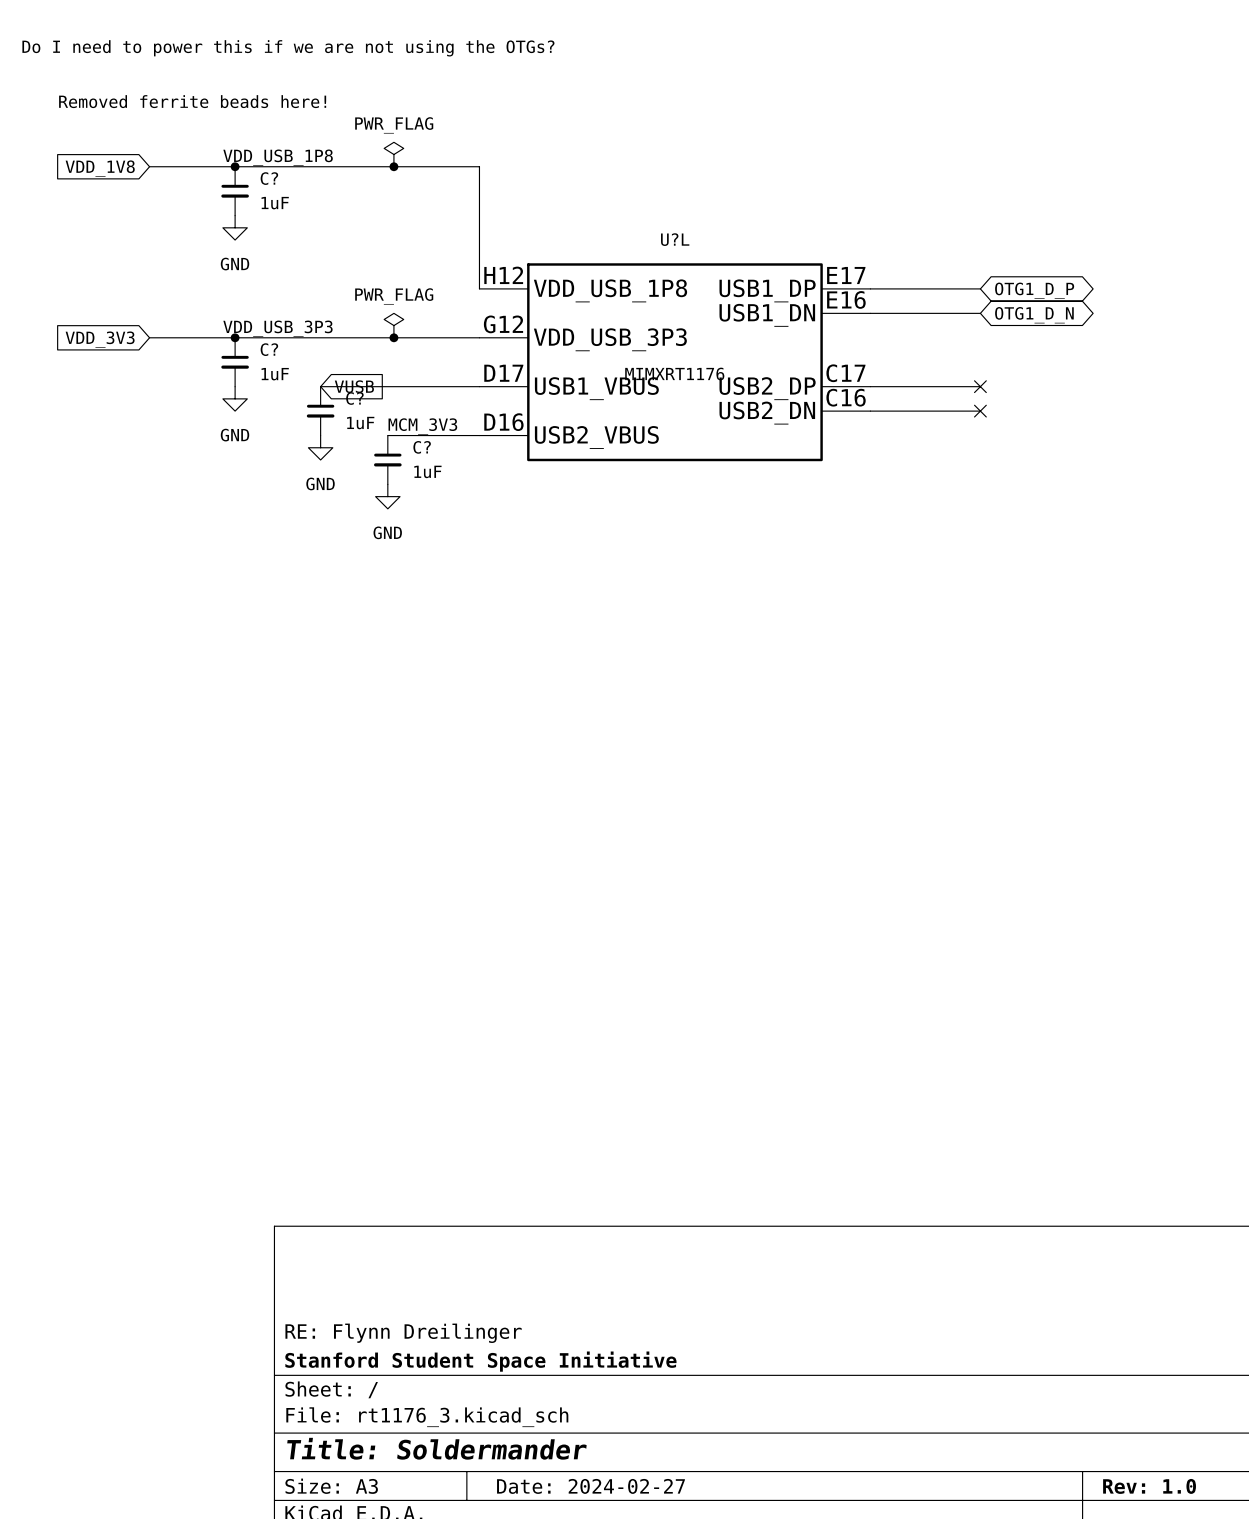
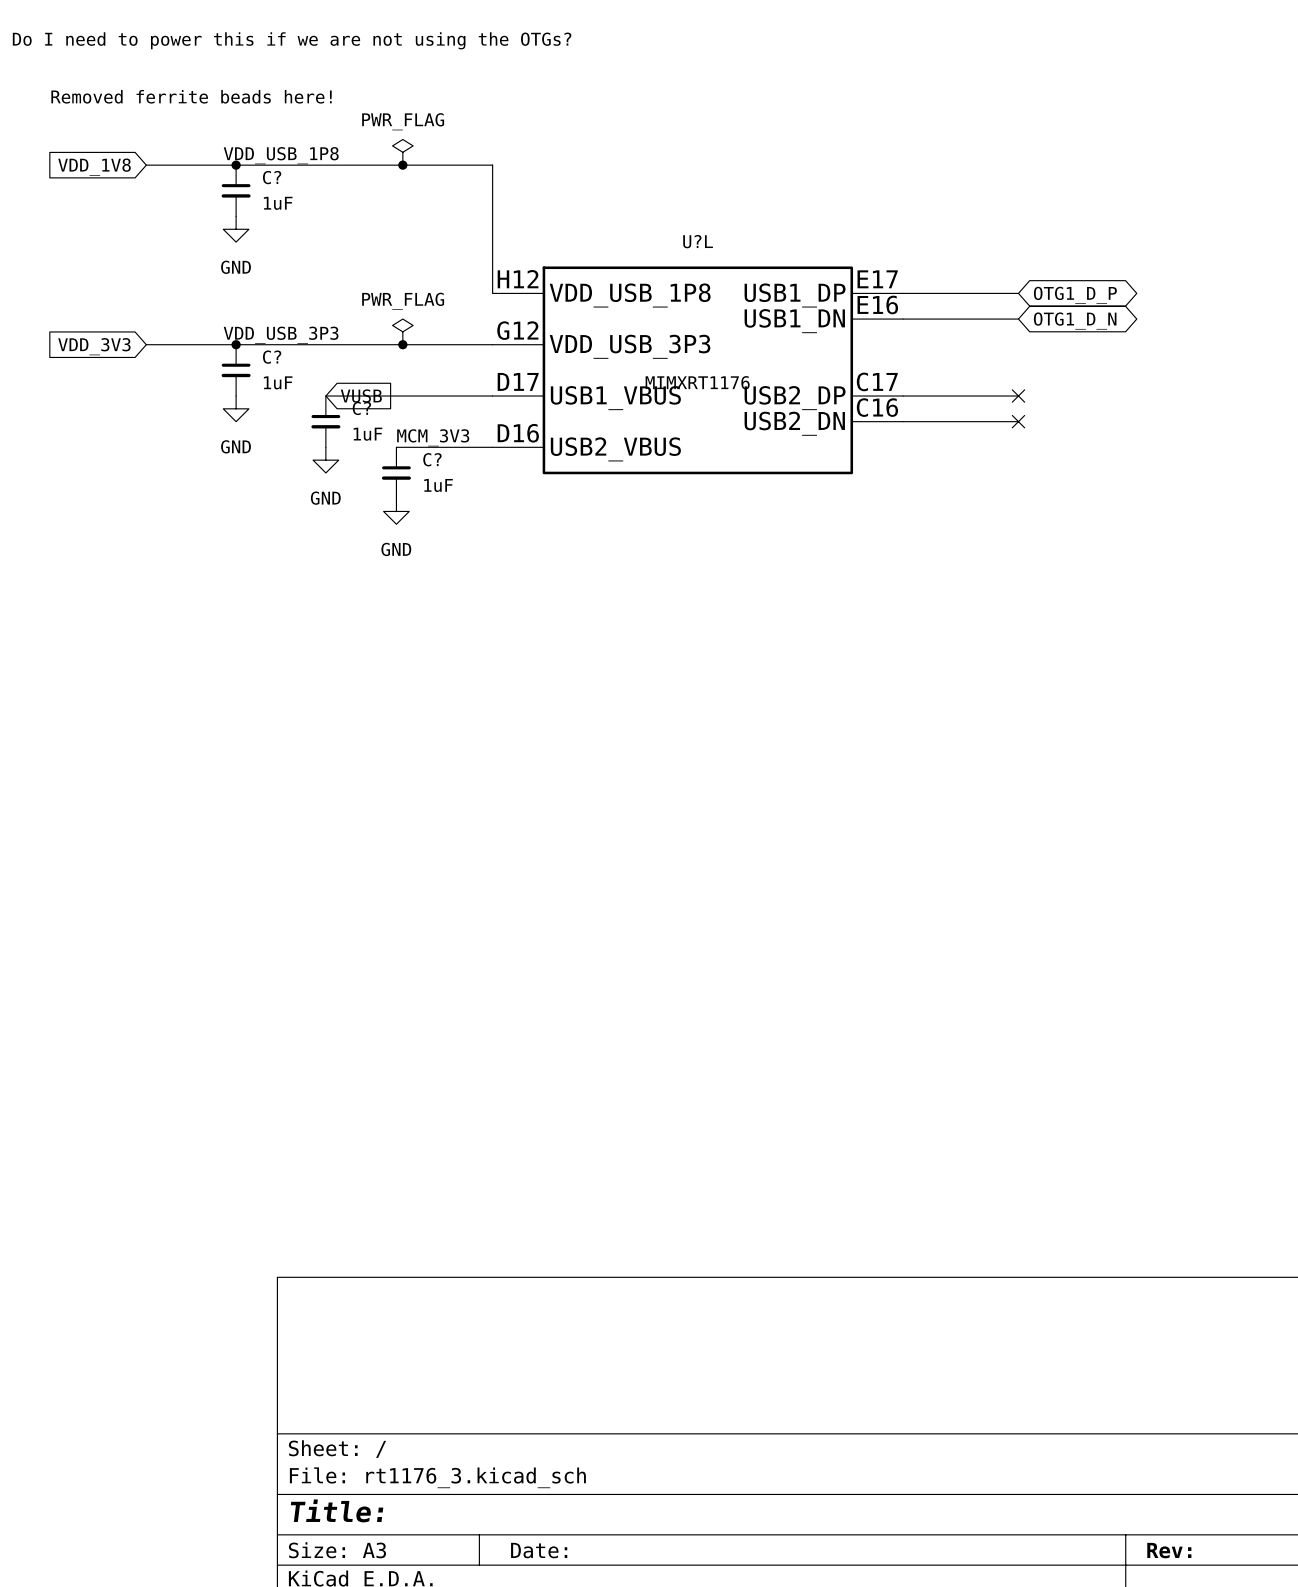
title block: RE: Flynn Dreilinger (403, 1333) -> none
title block: Stanford Student Space Initiative (480, 1361) -> none
title block: Title: Soldermander (436, 1448) -> Title: (337, 1510)
title block: Date: 2024-02-27 (590, 1486) -> Date: (539, 1550)
title block: Rev: 1.0 (1149, 1486) -> Rev: (1169, 1550)

